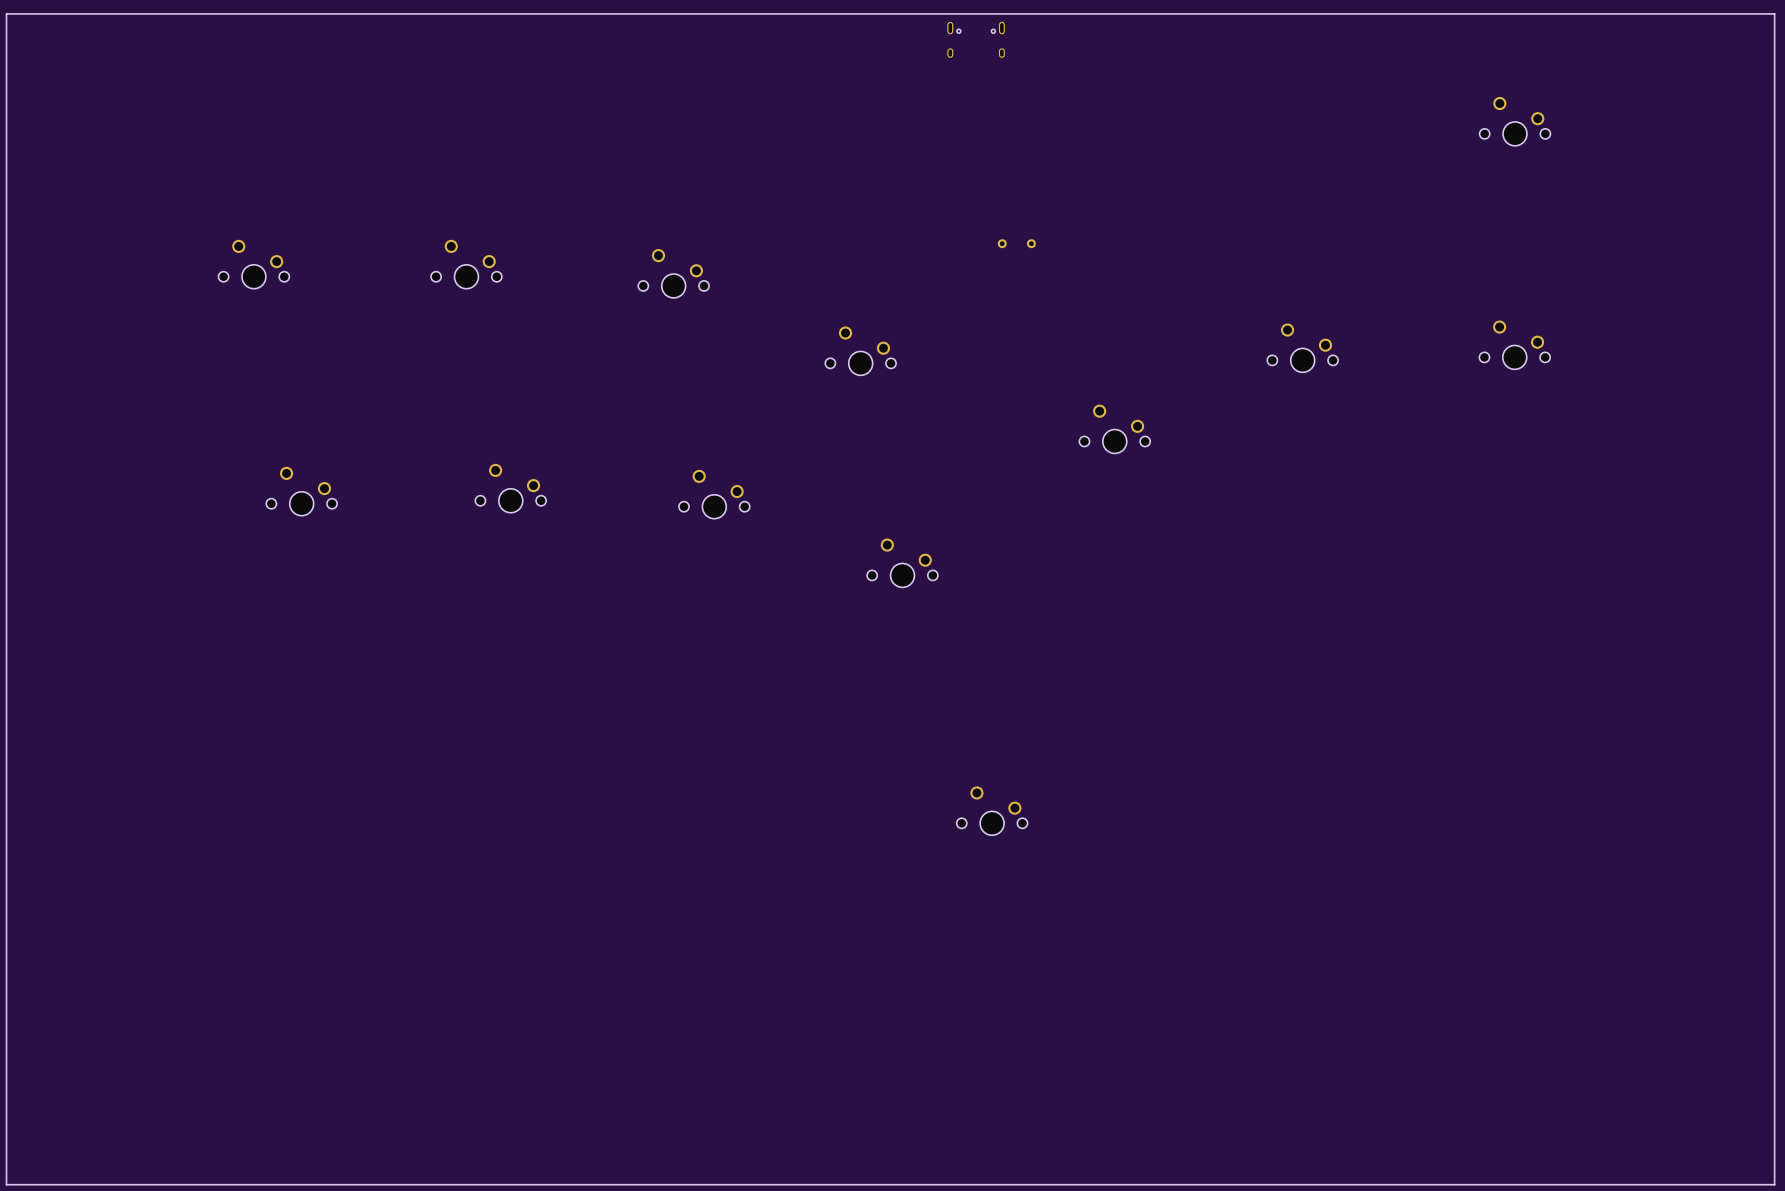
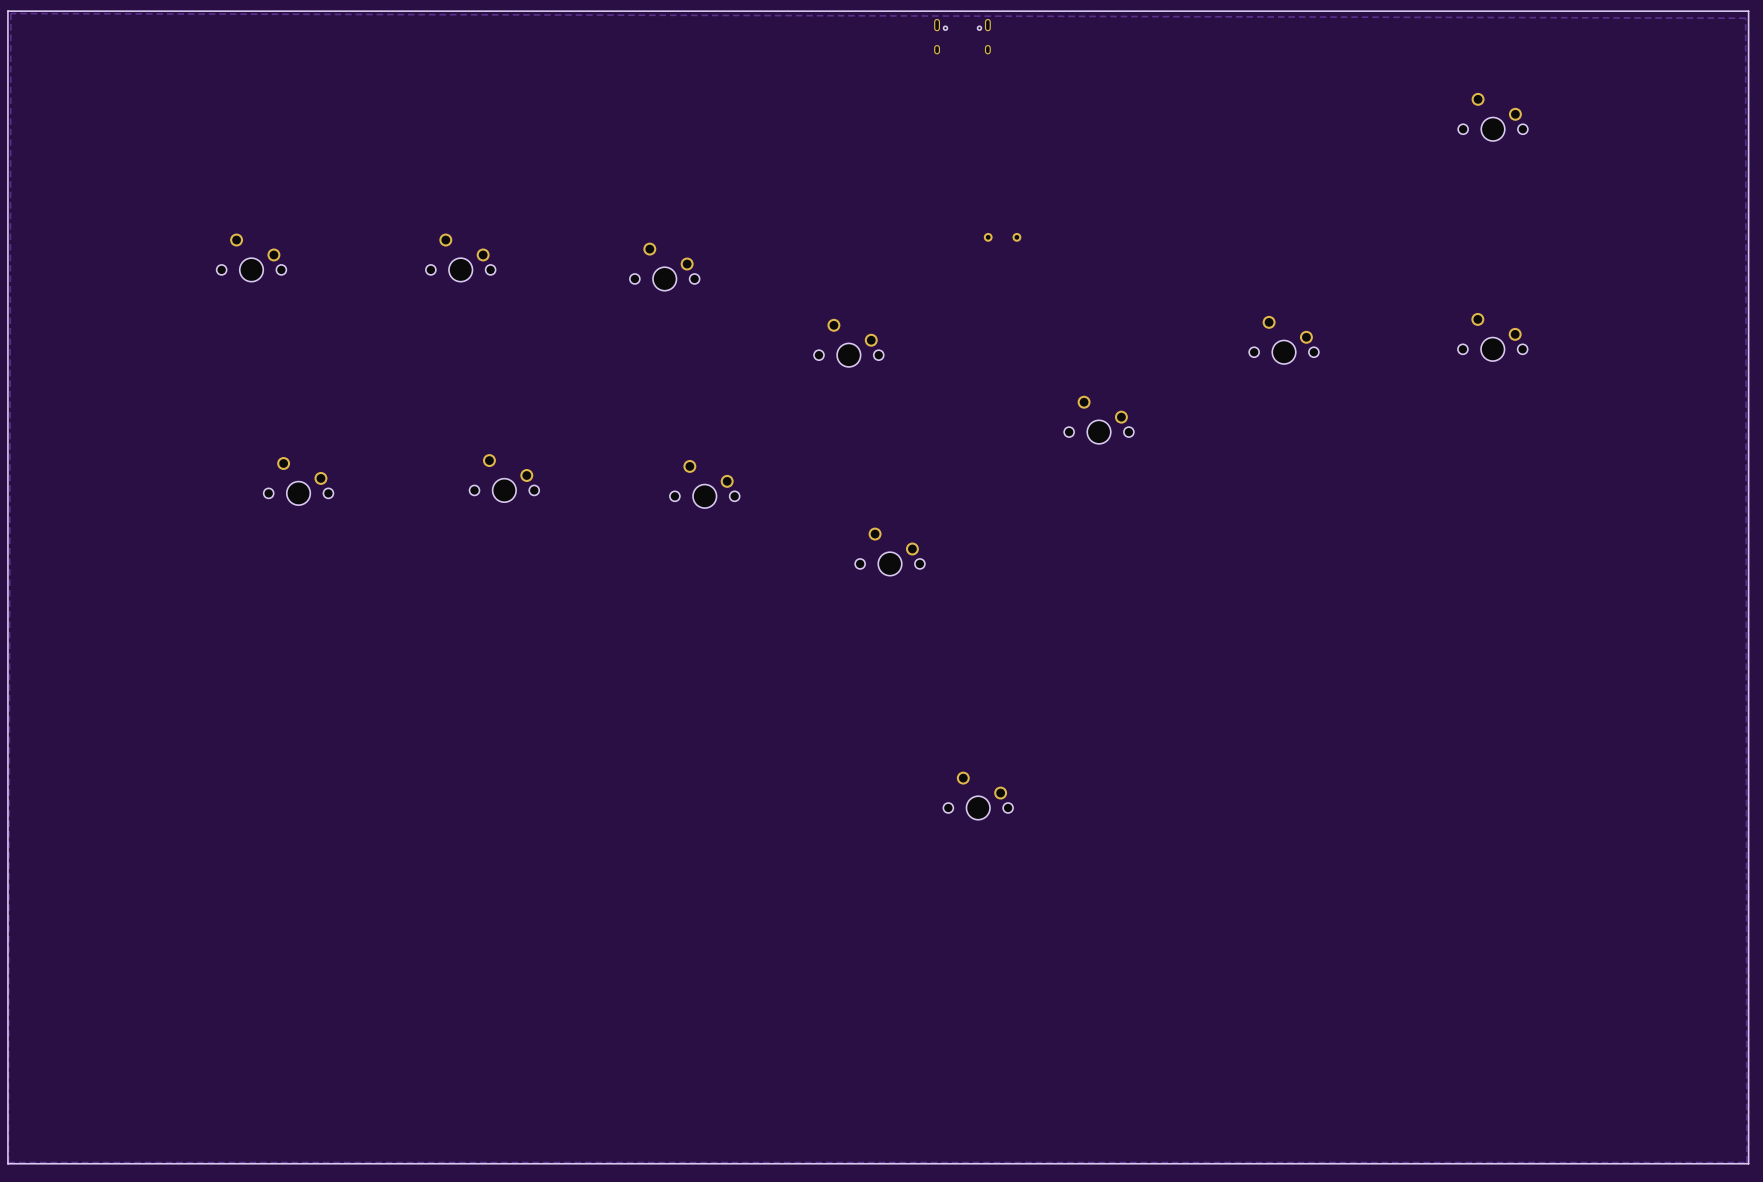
zone outline: none -> (10, 13) (1745, 18) (1746, 1162) (8, 1162) (10, 13)

